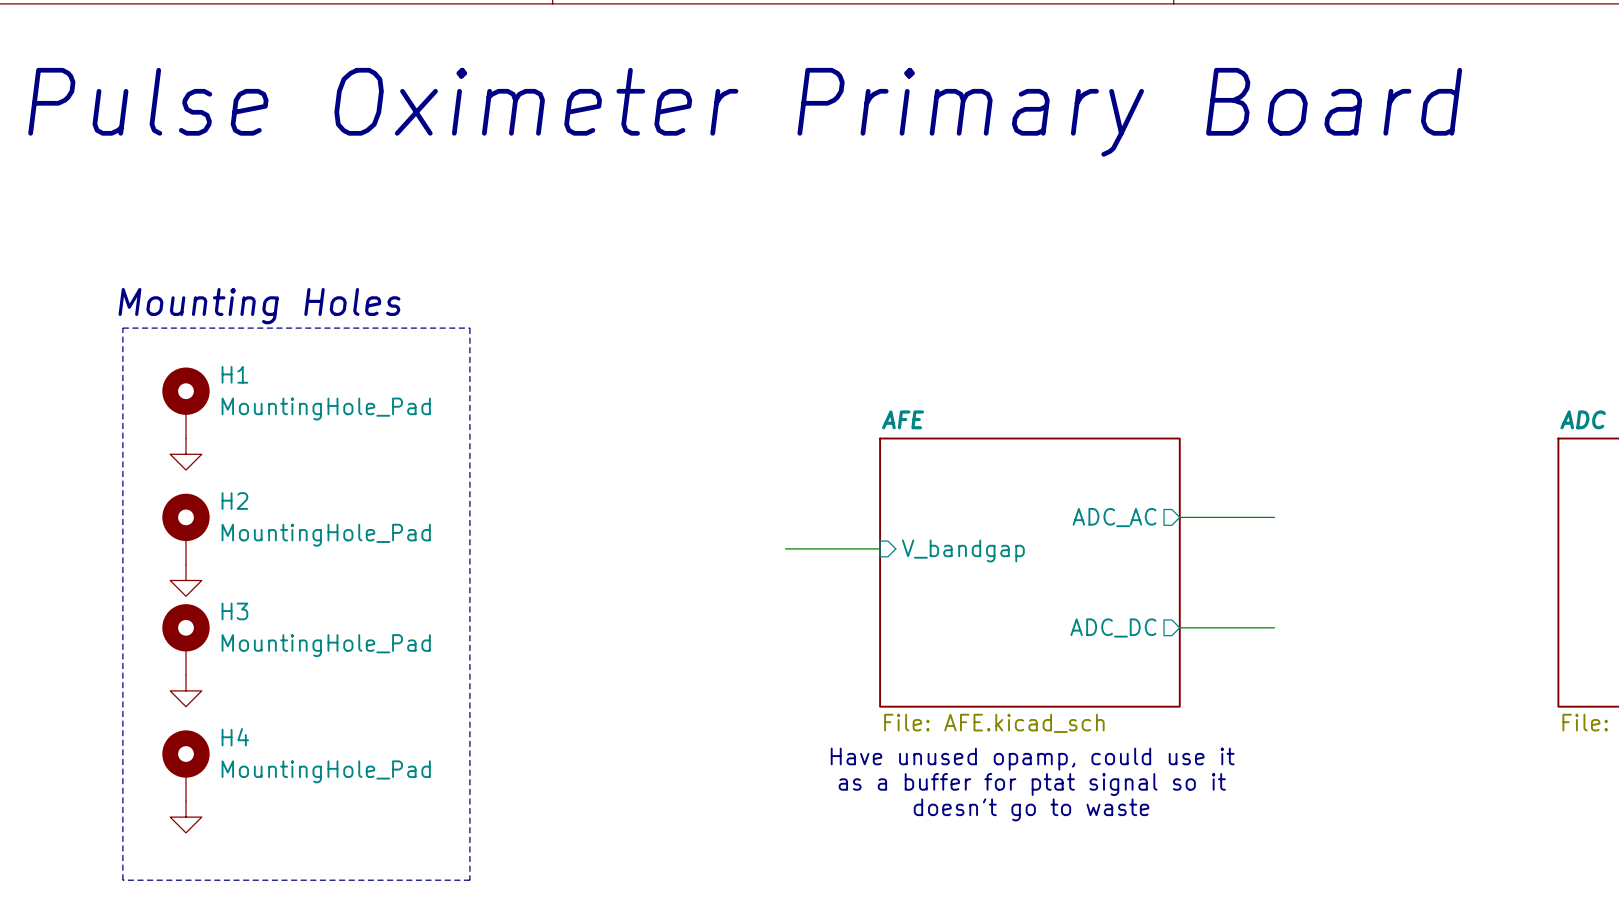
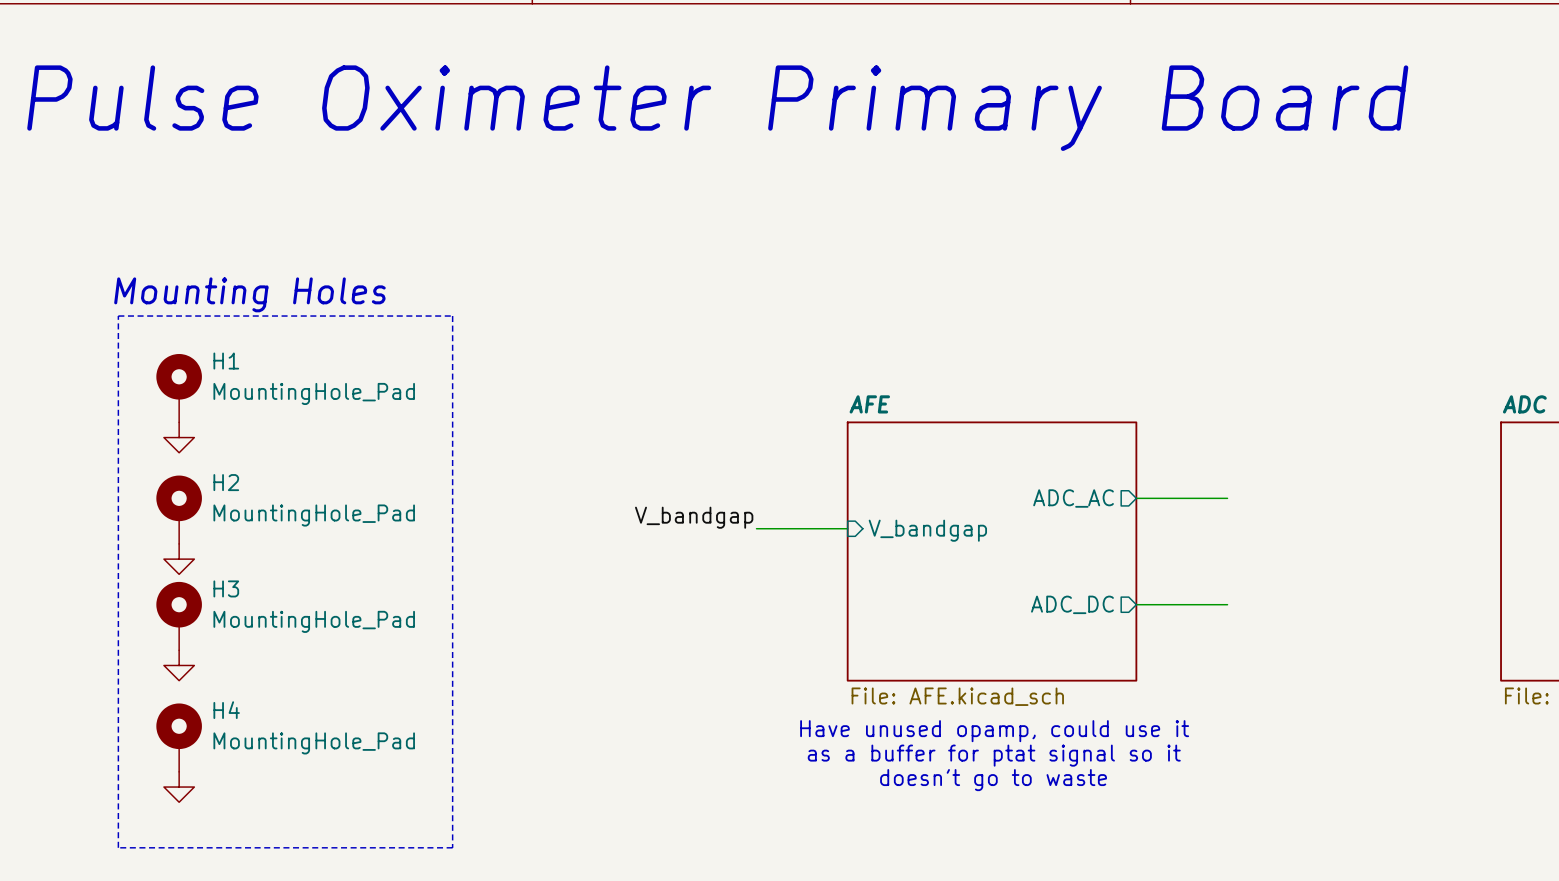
label: none -> V_bandgap (694, 517)

